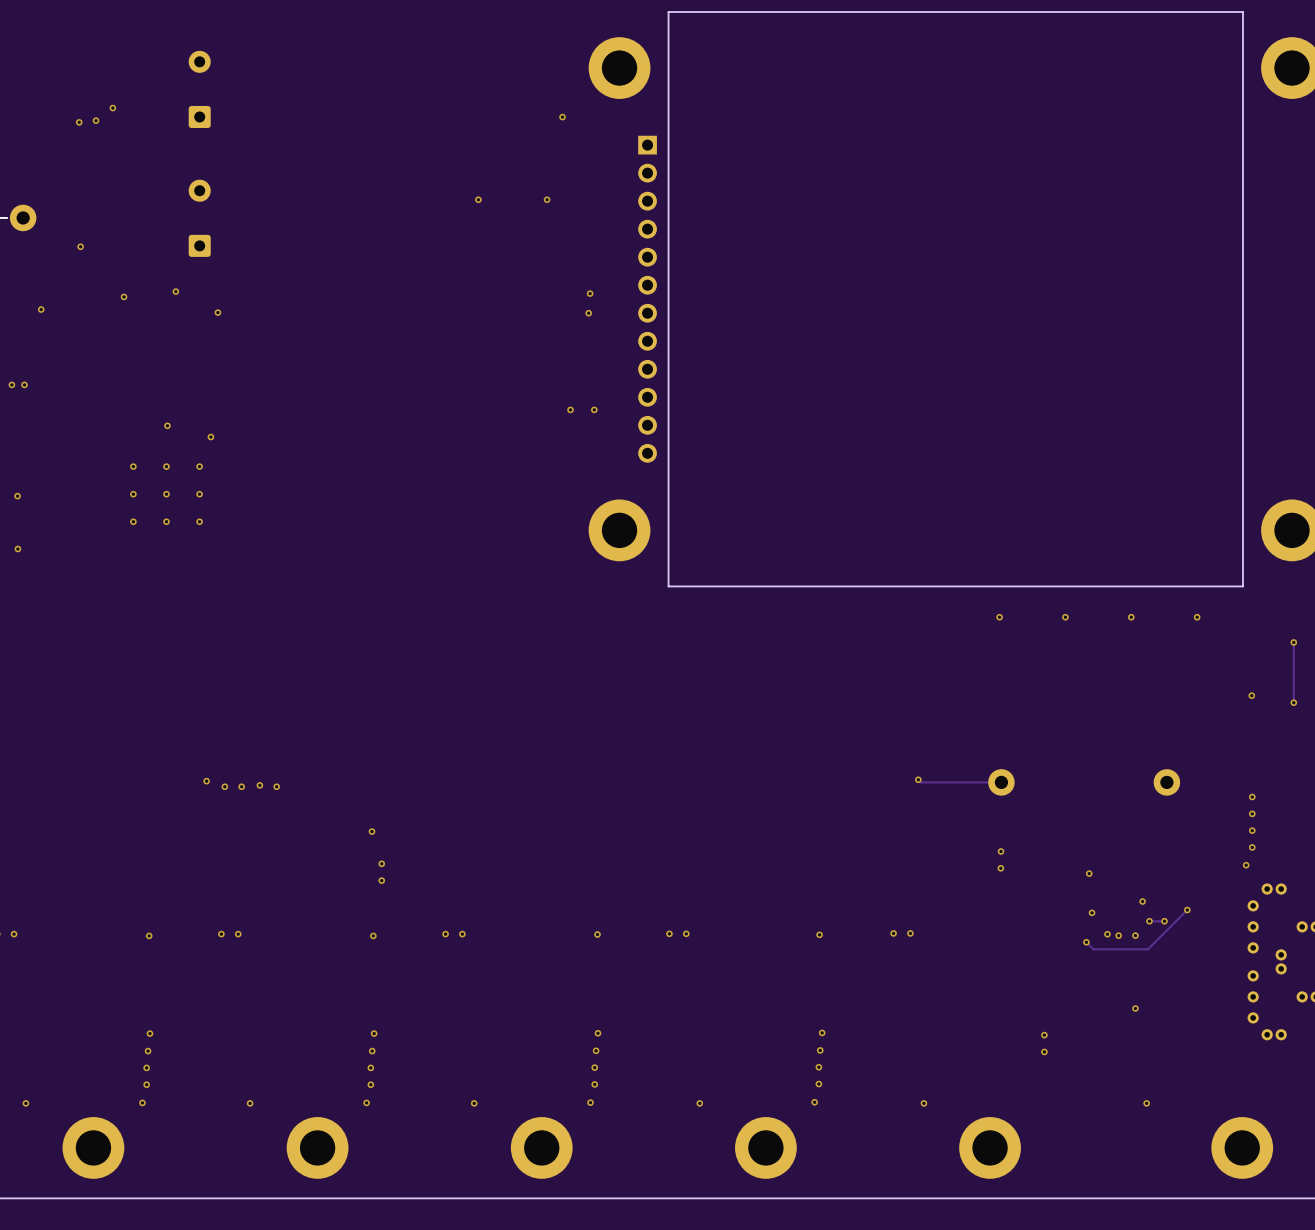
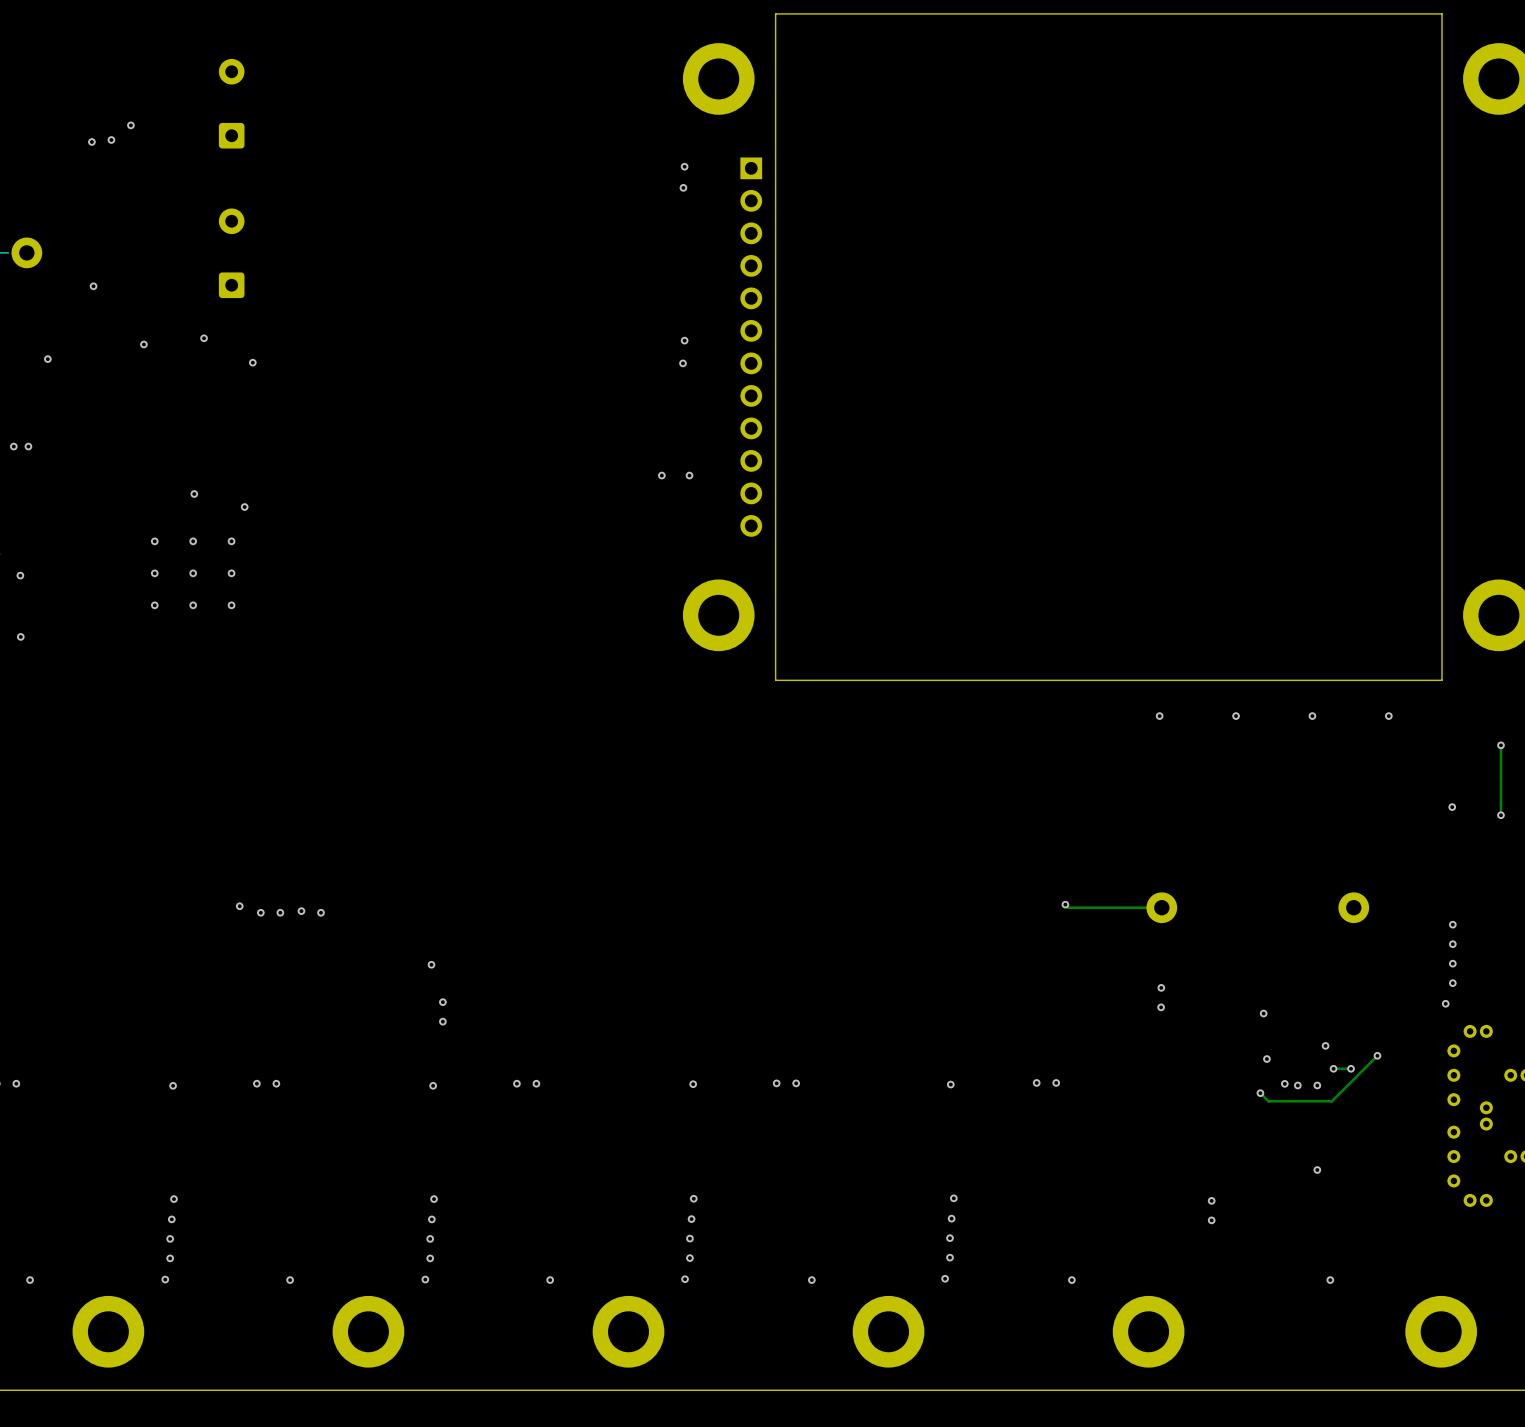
via: (562, 117) -> none
via: none -> (684, 166)
via: none -> (683, 187)
via: (478, 199) -> none
via: (547, 199) -> none

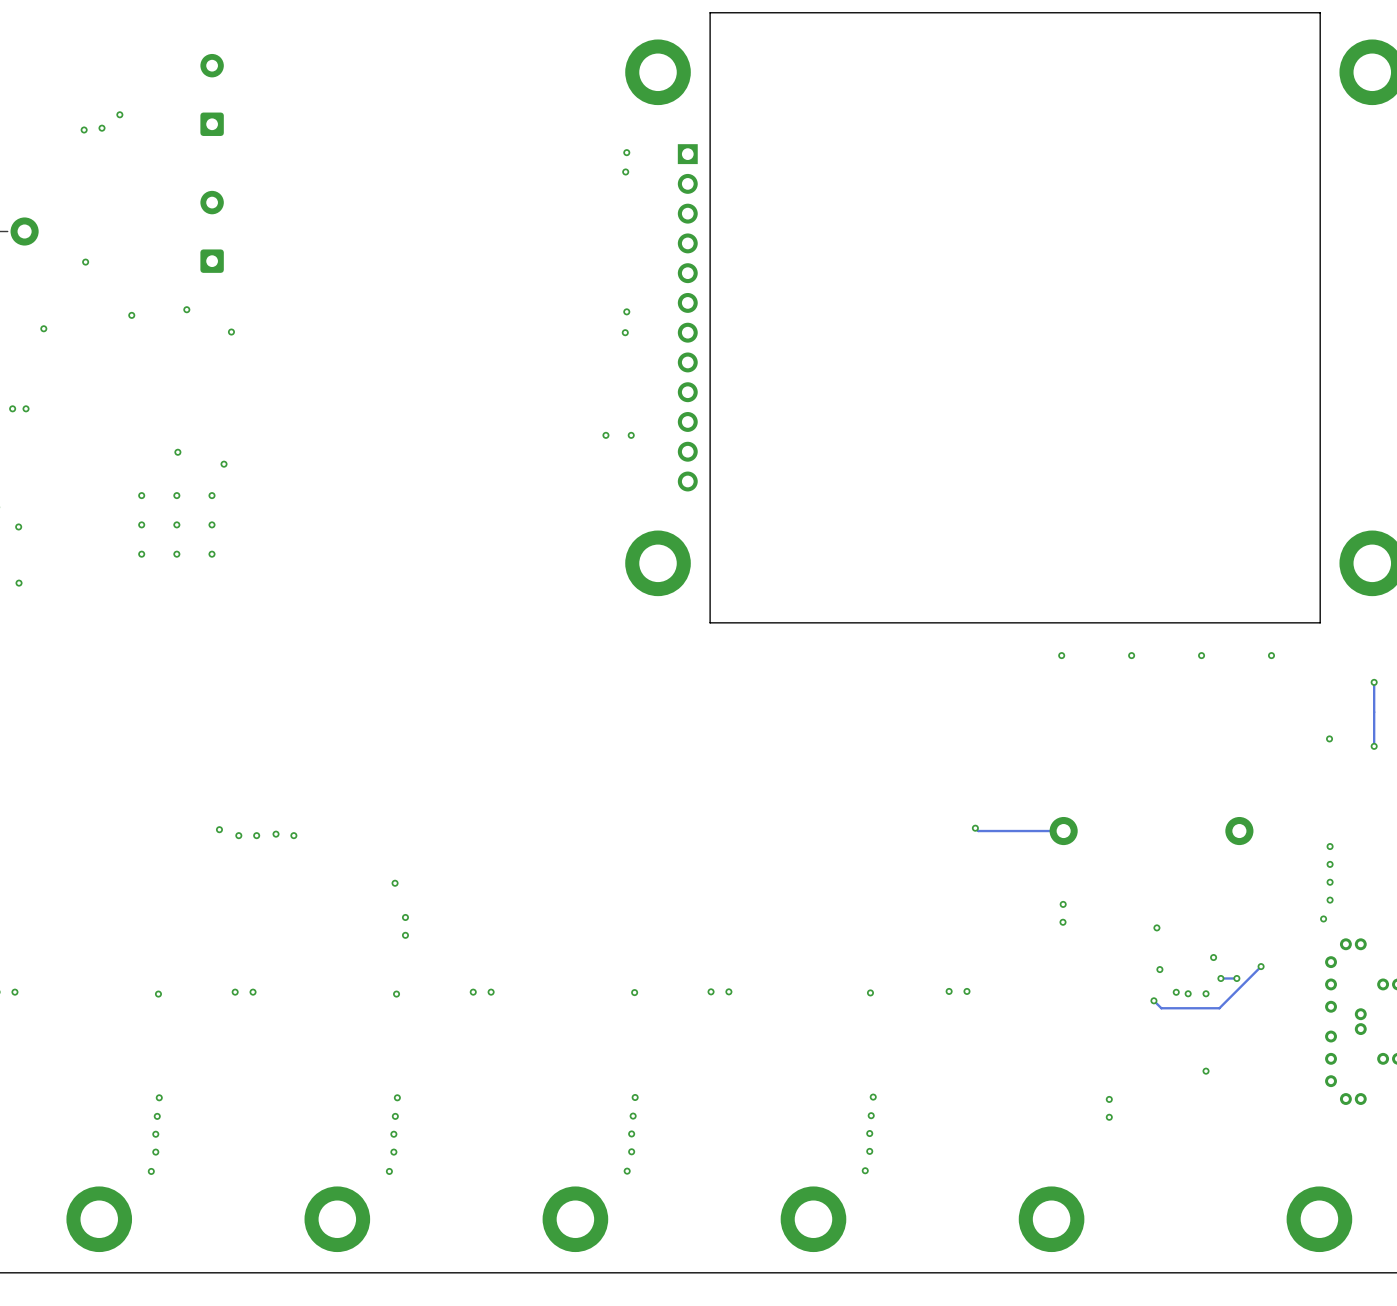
via: (30, 1280) -> none
via: (290, 1280) -> none
via: (550, 1280) -> none
via: (811, 1280) -> none
via: (1071, 1280) -> none
via: (1330, 1280) -> none

